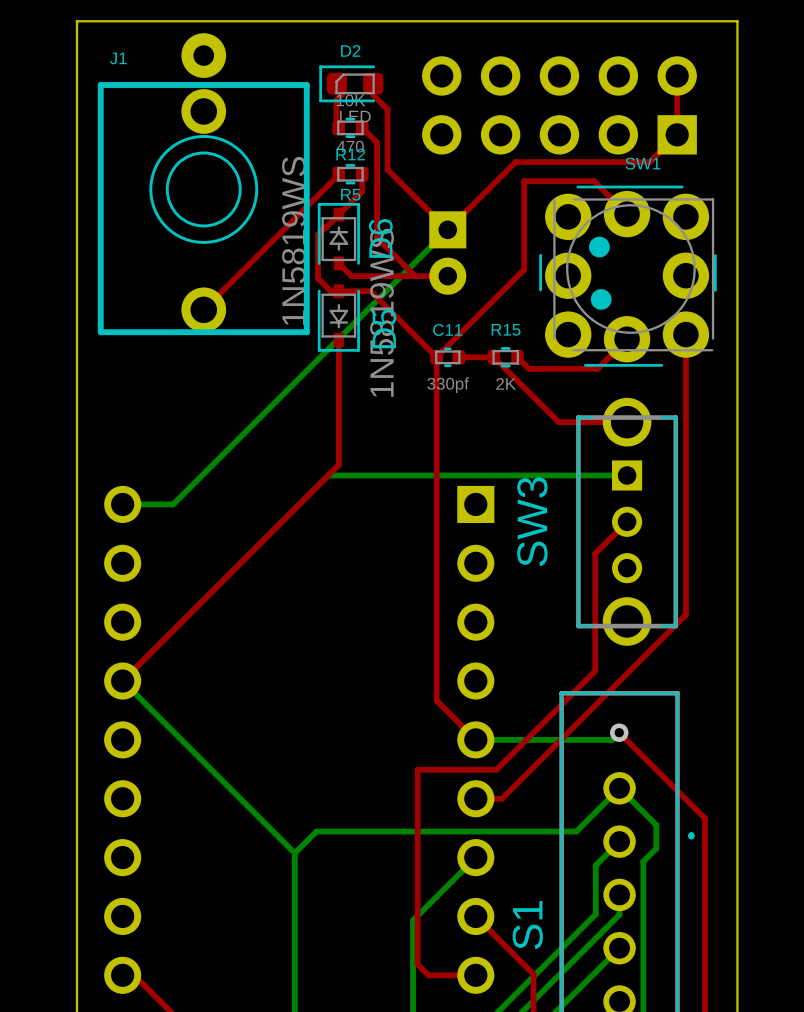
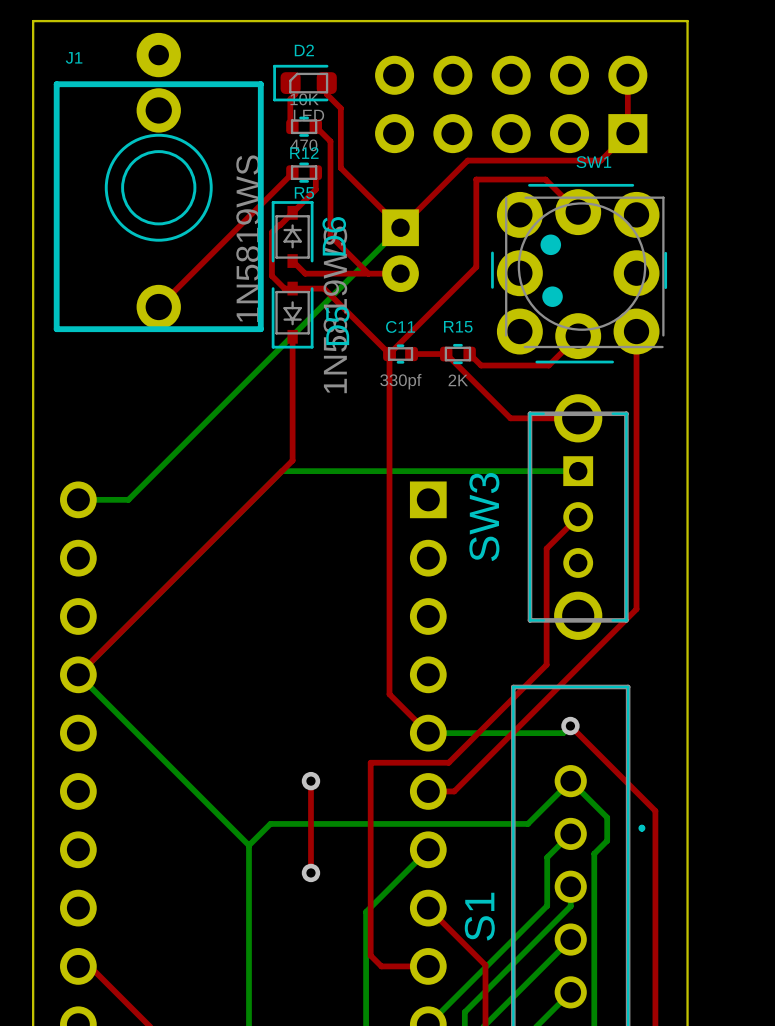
top track: none -> (310, 781) (310, 872)
via: none -> (310, 781)
via: none -> (310, 872)

